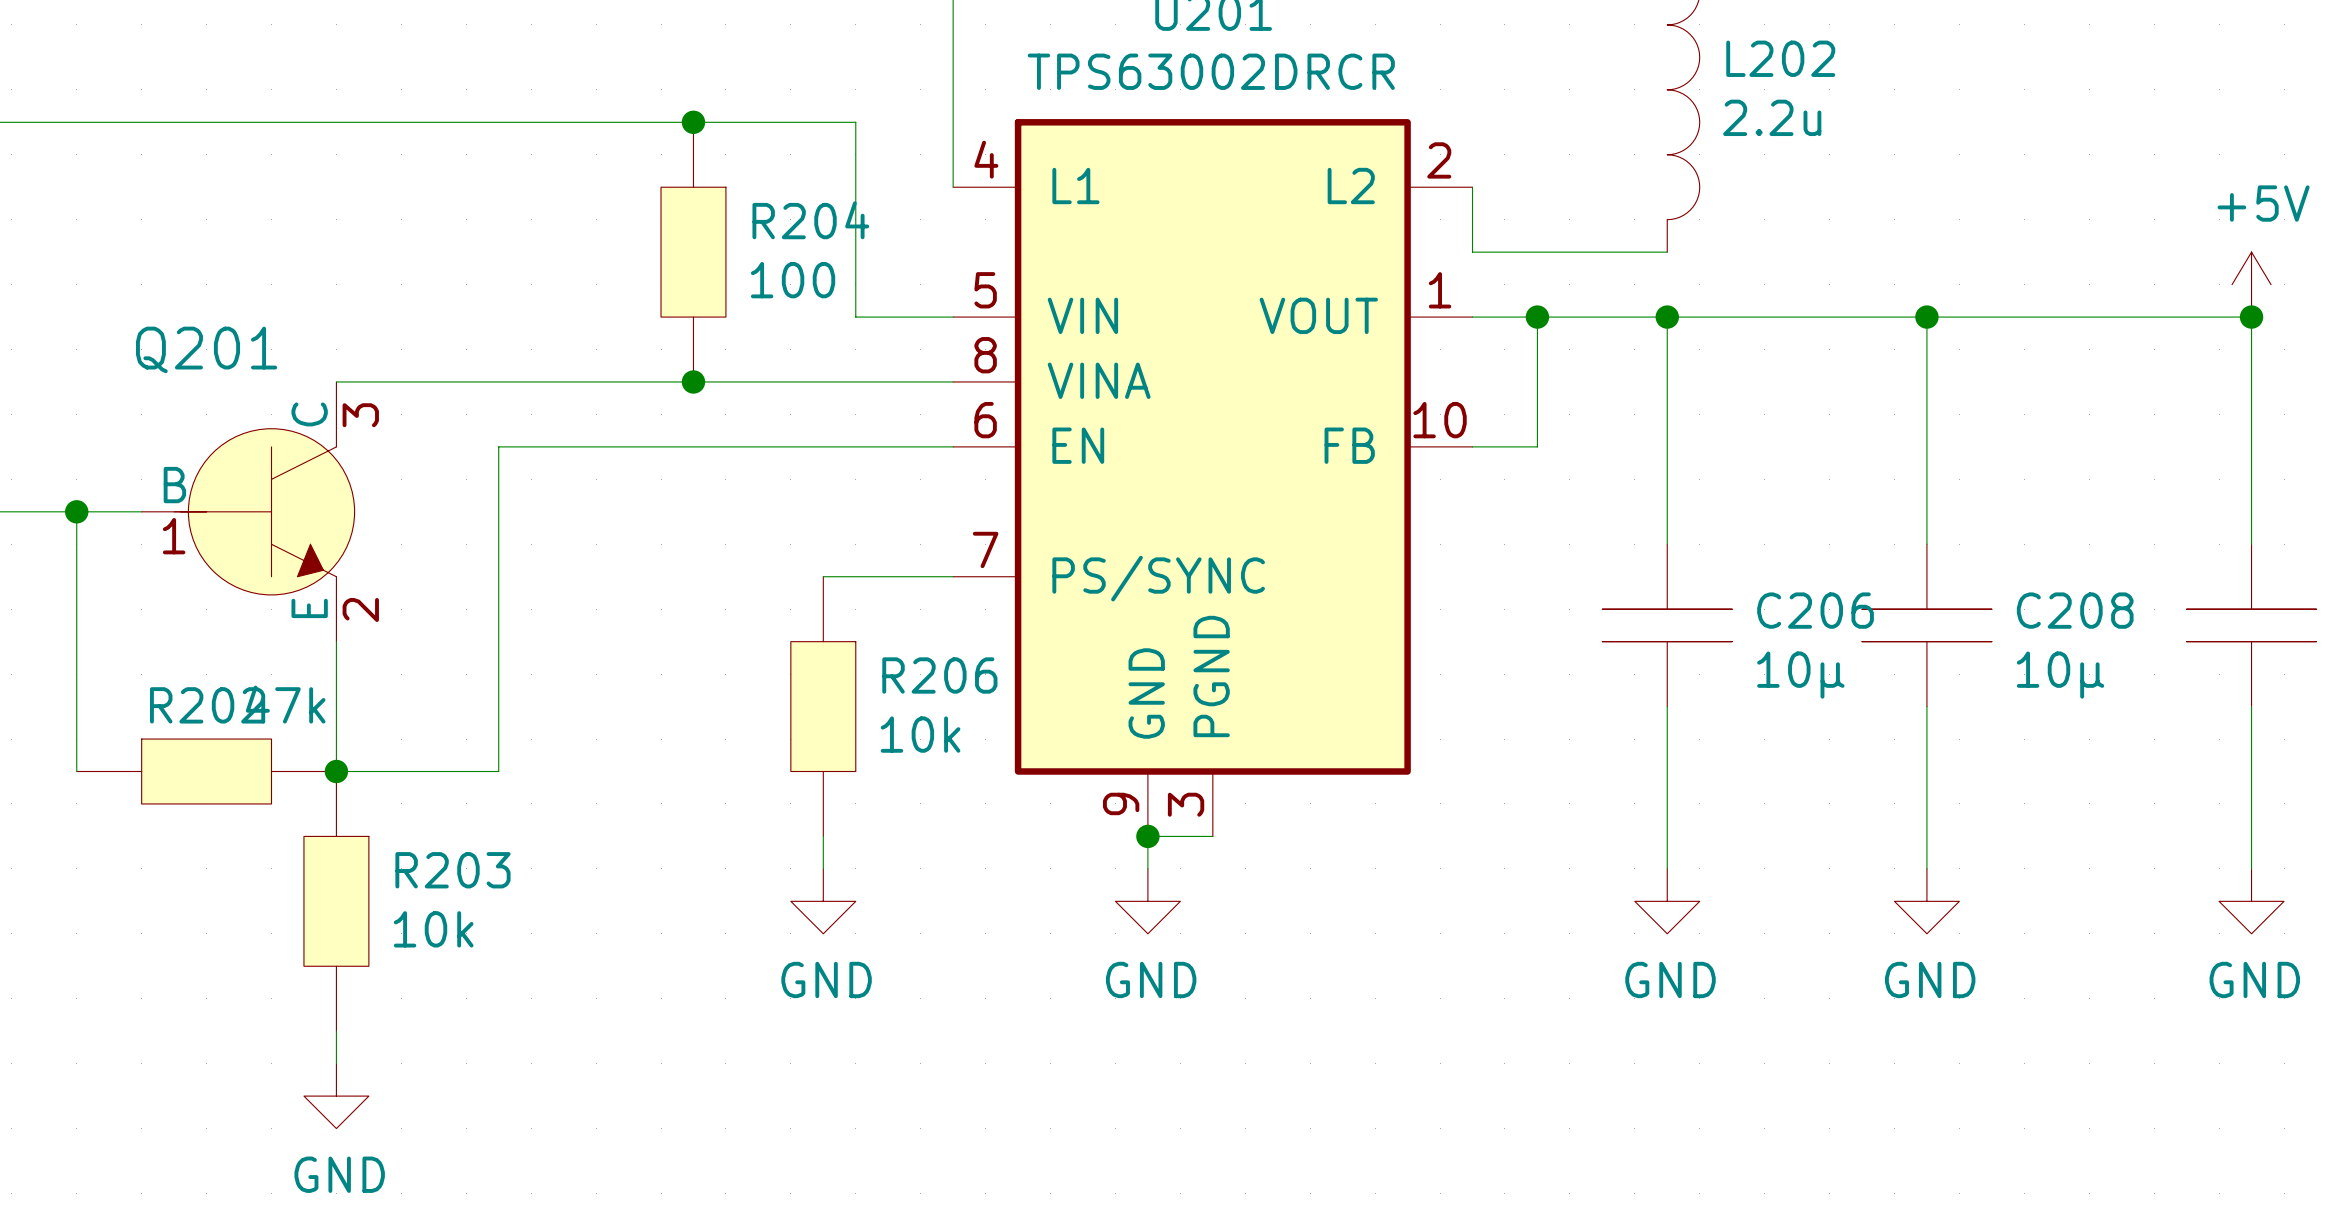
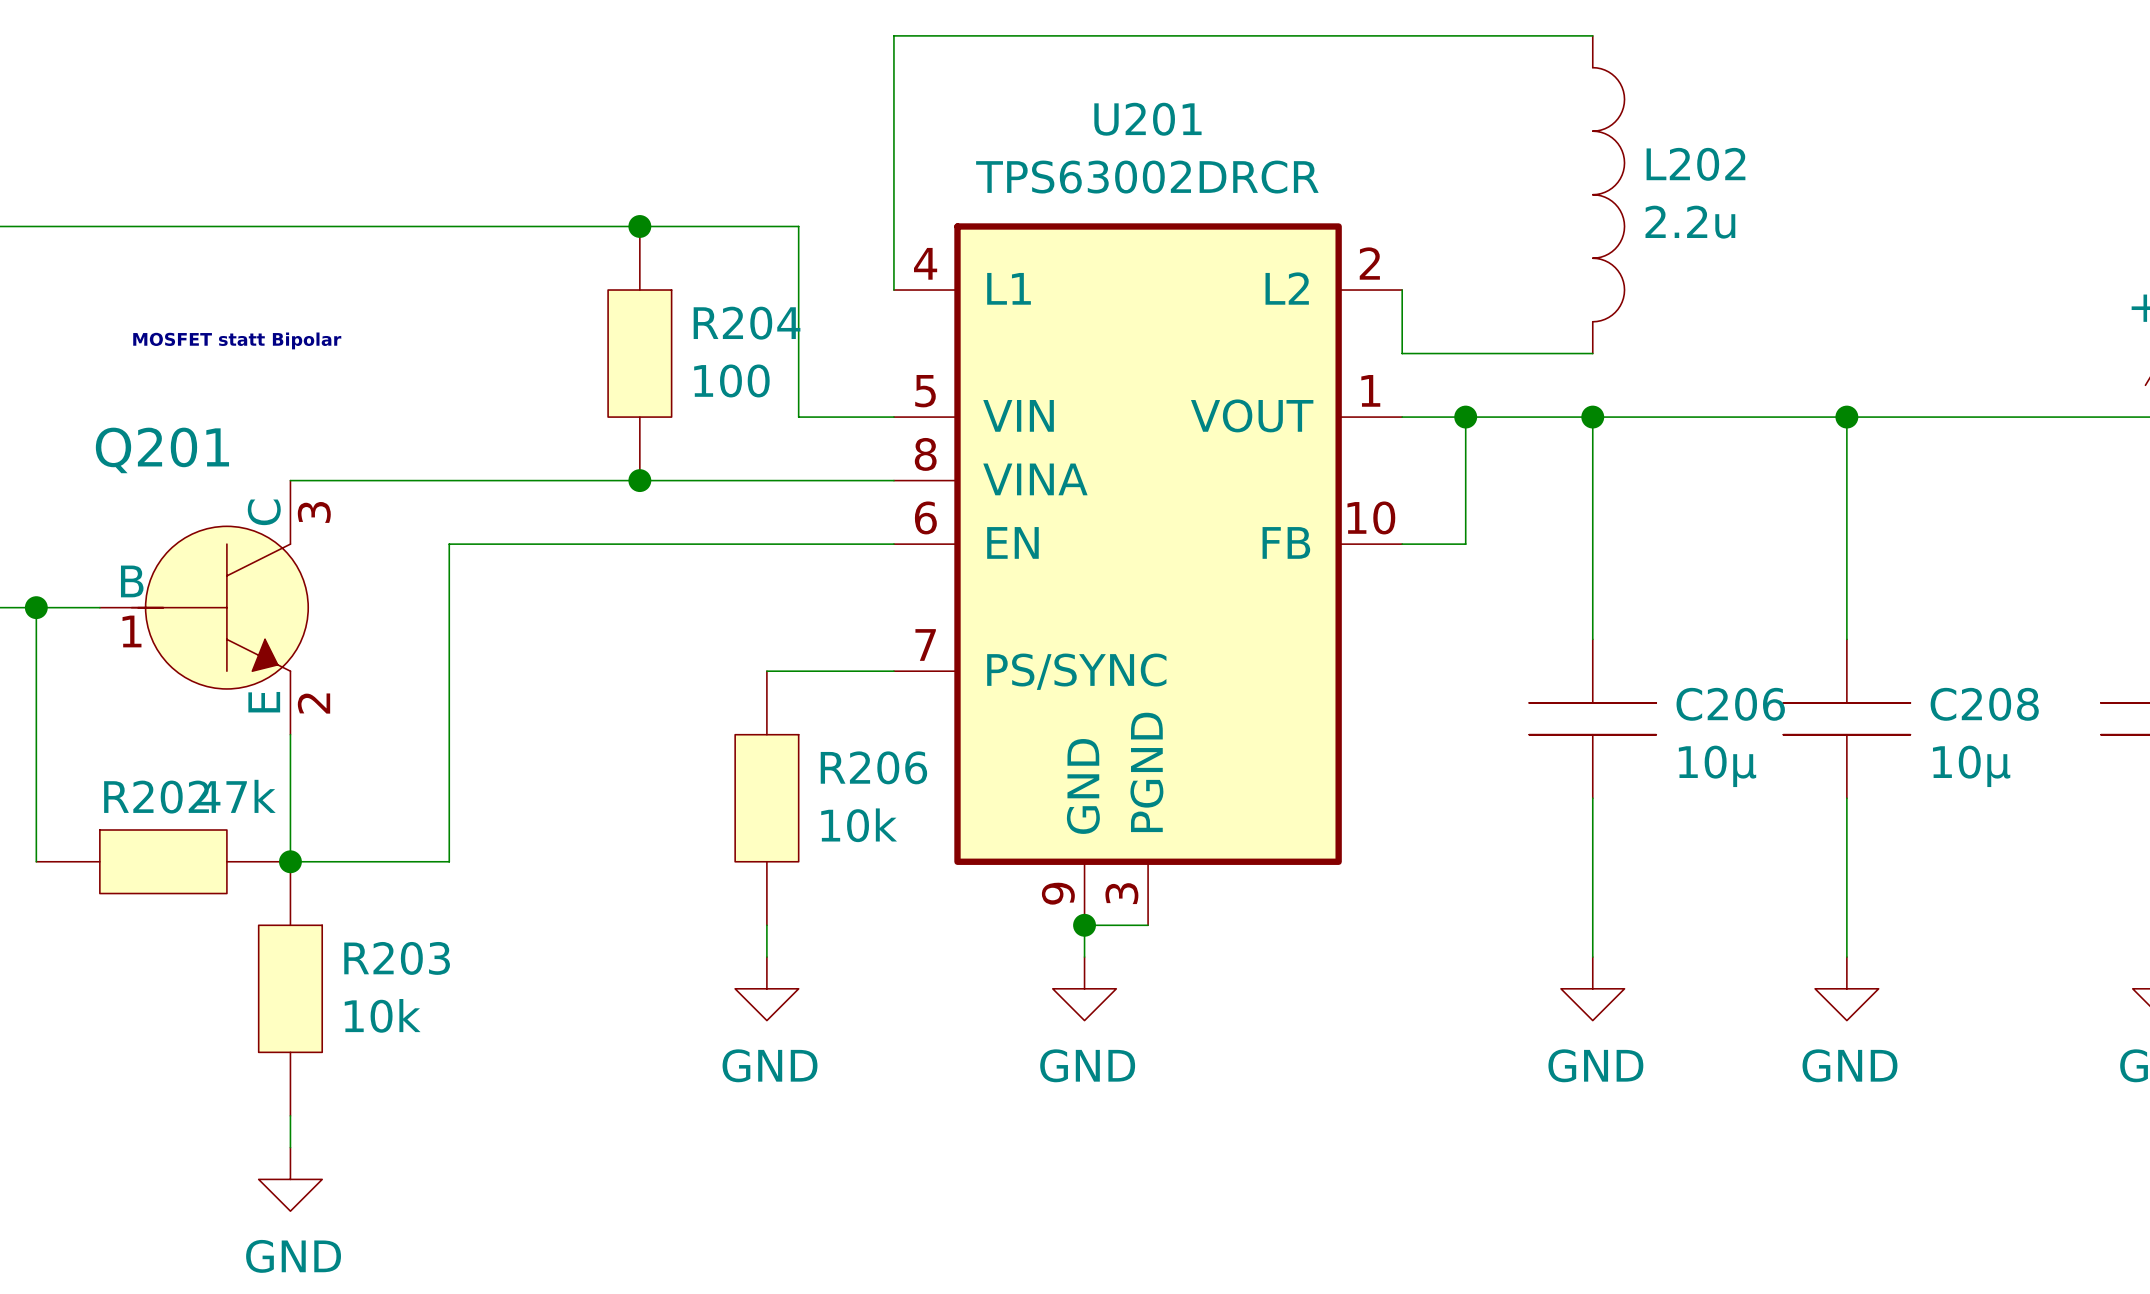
text: none -> MOSFET statt Bipolar (237, 340)

